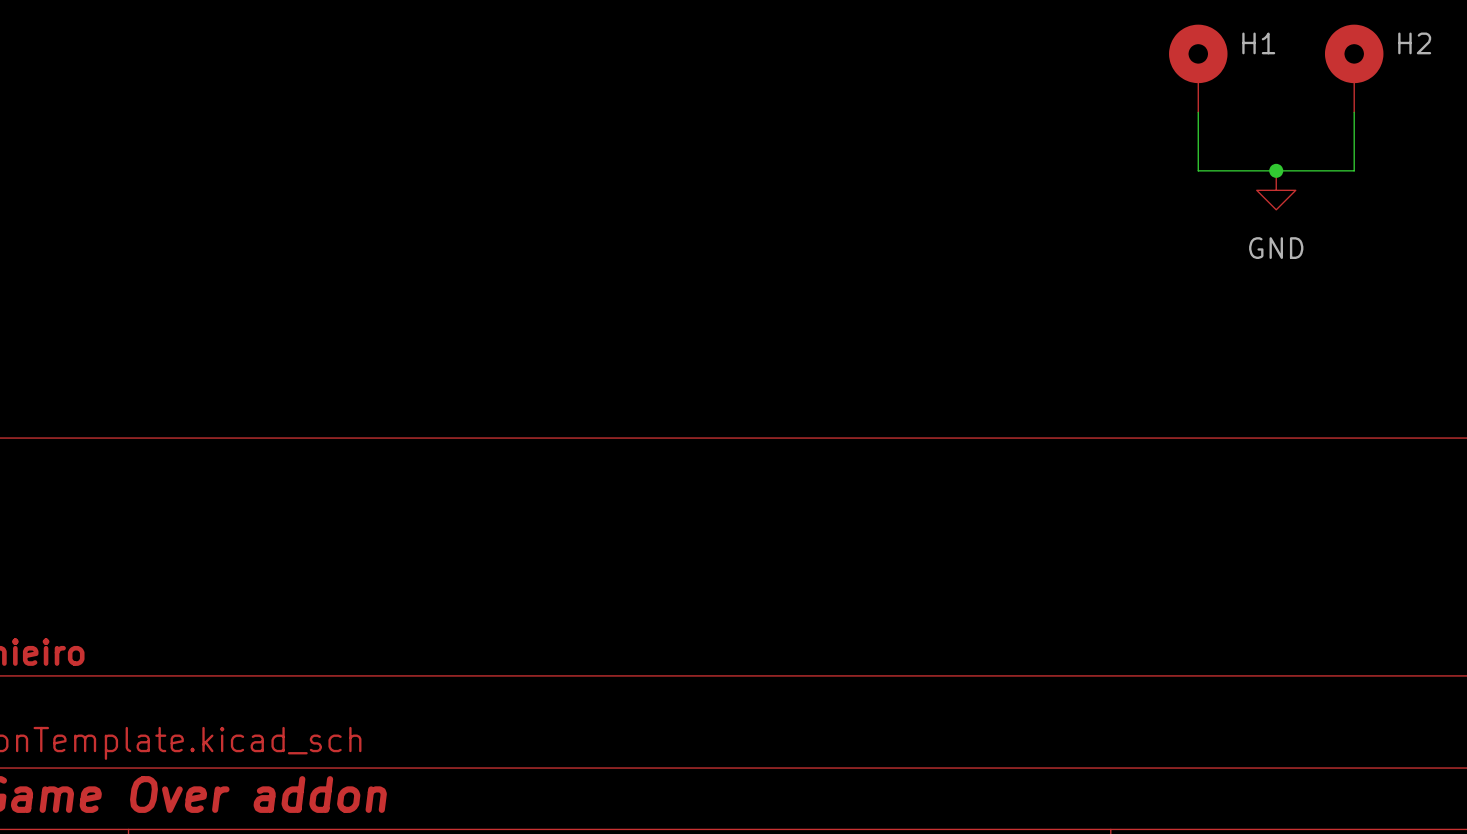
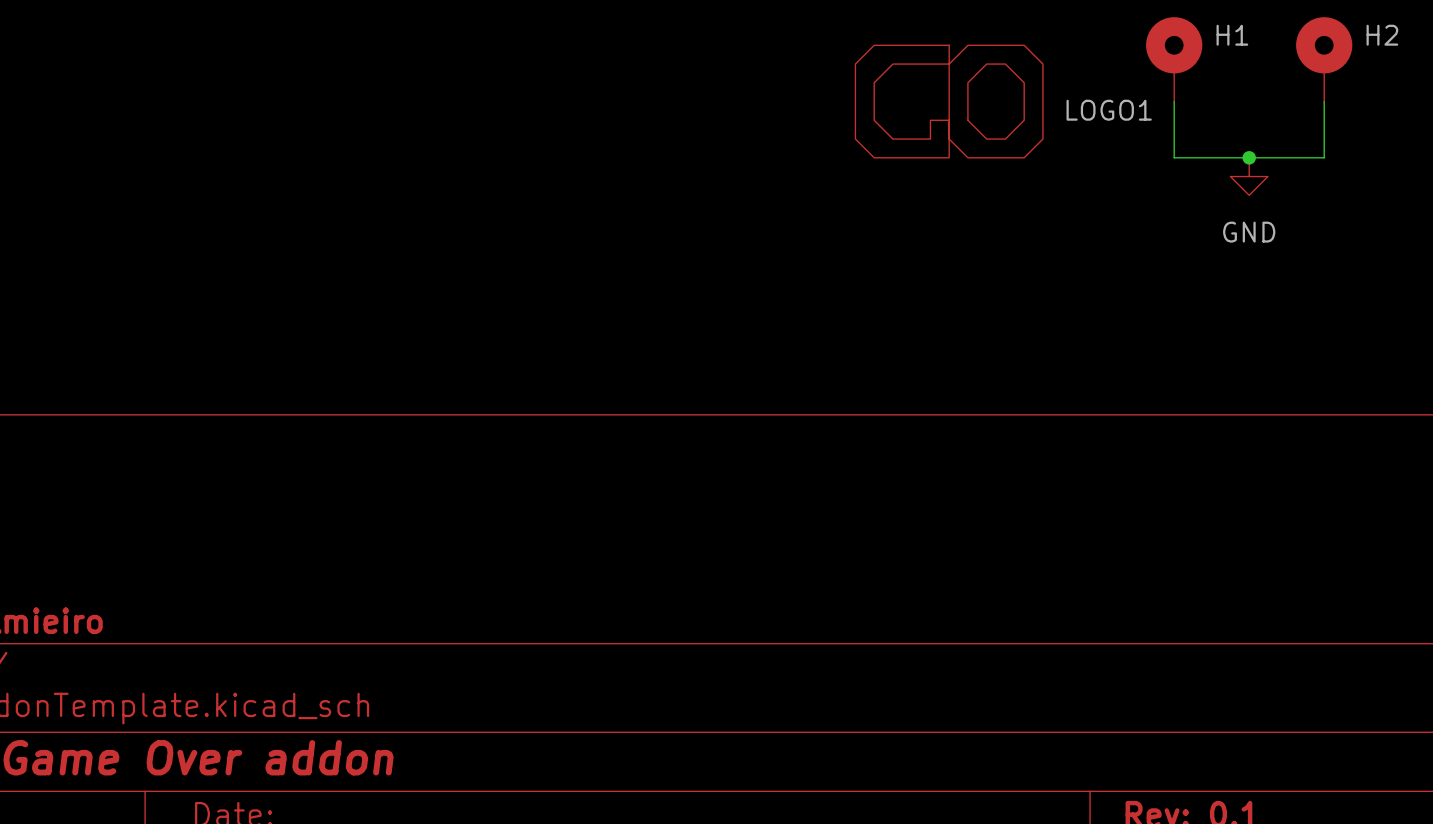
LOGO1: none -> (949, 101)

